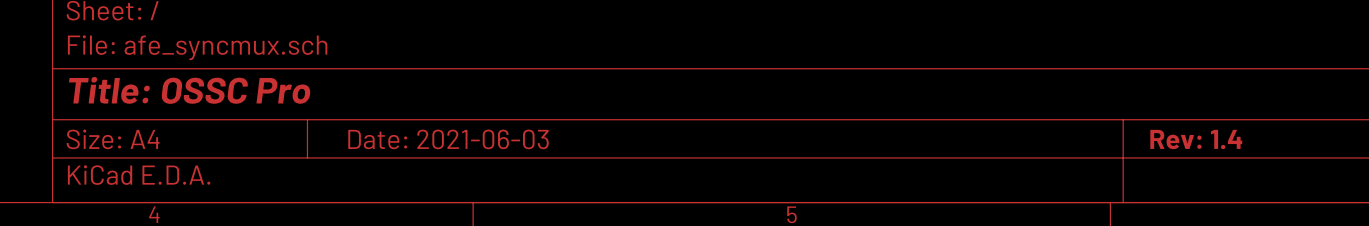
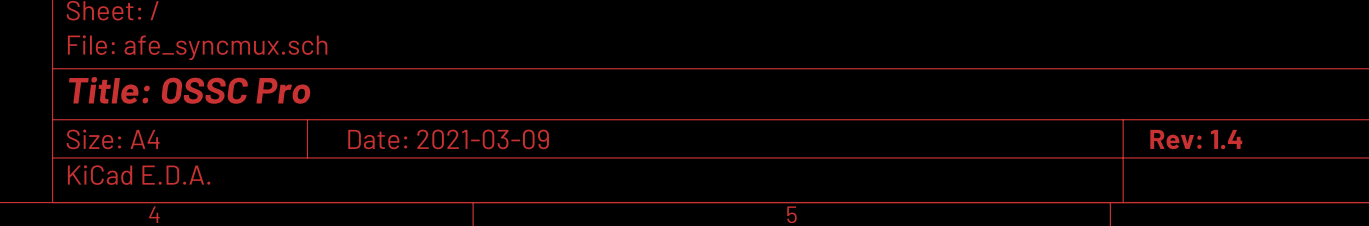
title block: Date: 2021-06-03 (448, 139) -> Date: 2021-03-09 (448, 139)

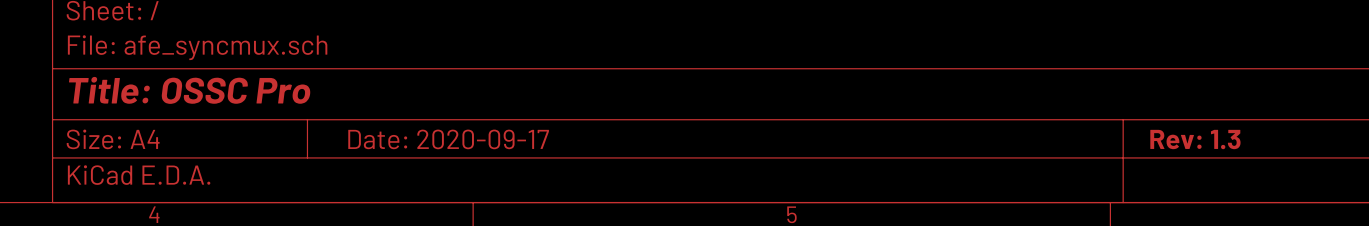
title block: Date: 2021-03-09 (448, 139) -> Date: 2020-09-17 (448, 139)
title block: Rev: 1.4 (1196, 139) -> Rev: 1.3 (1195, 139)

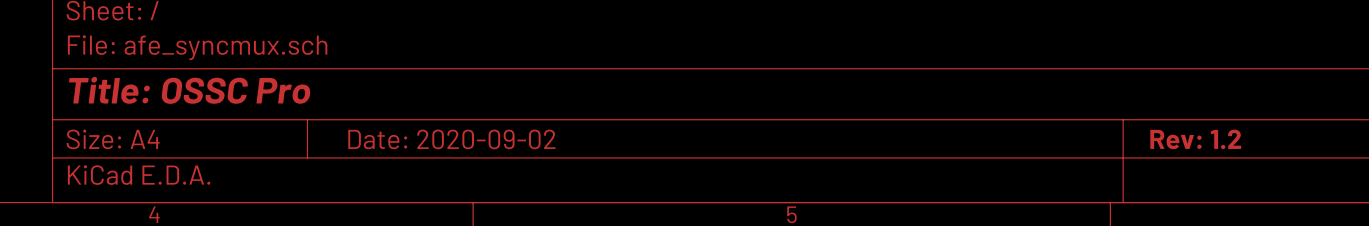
title block: Date: 2020-09-17 (448, 139) -> Date: 2020-09-02 (451, 139)
title block: Rev: 1.3 (1195, 139) -> Rev: 1.2 (1195, 139)

